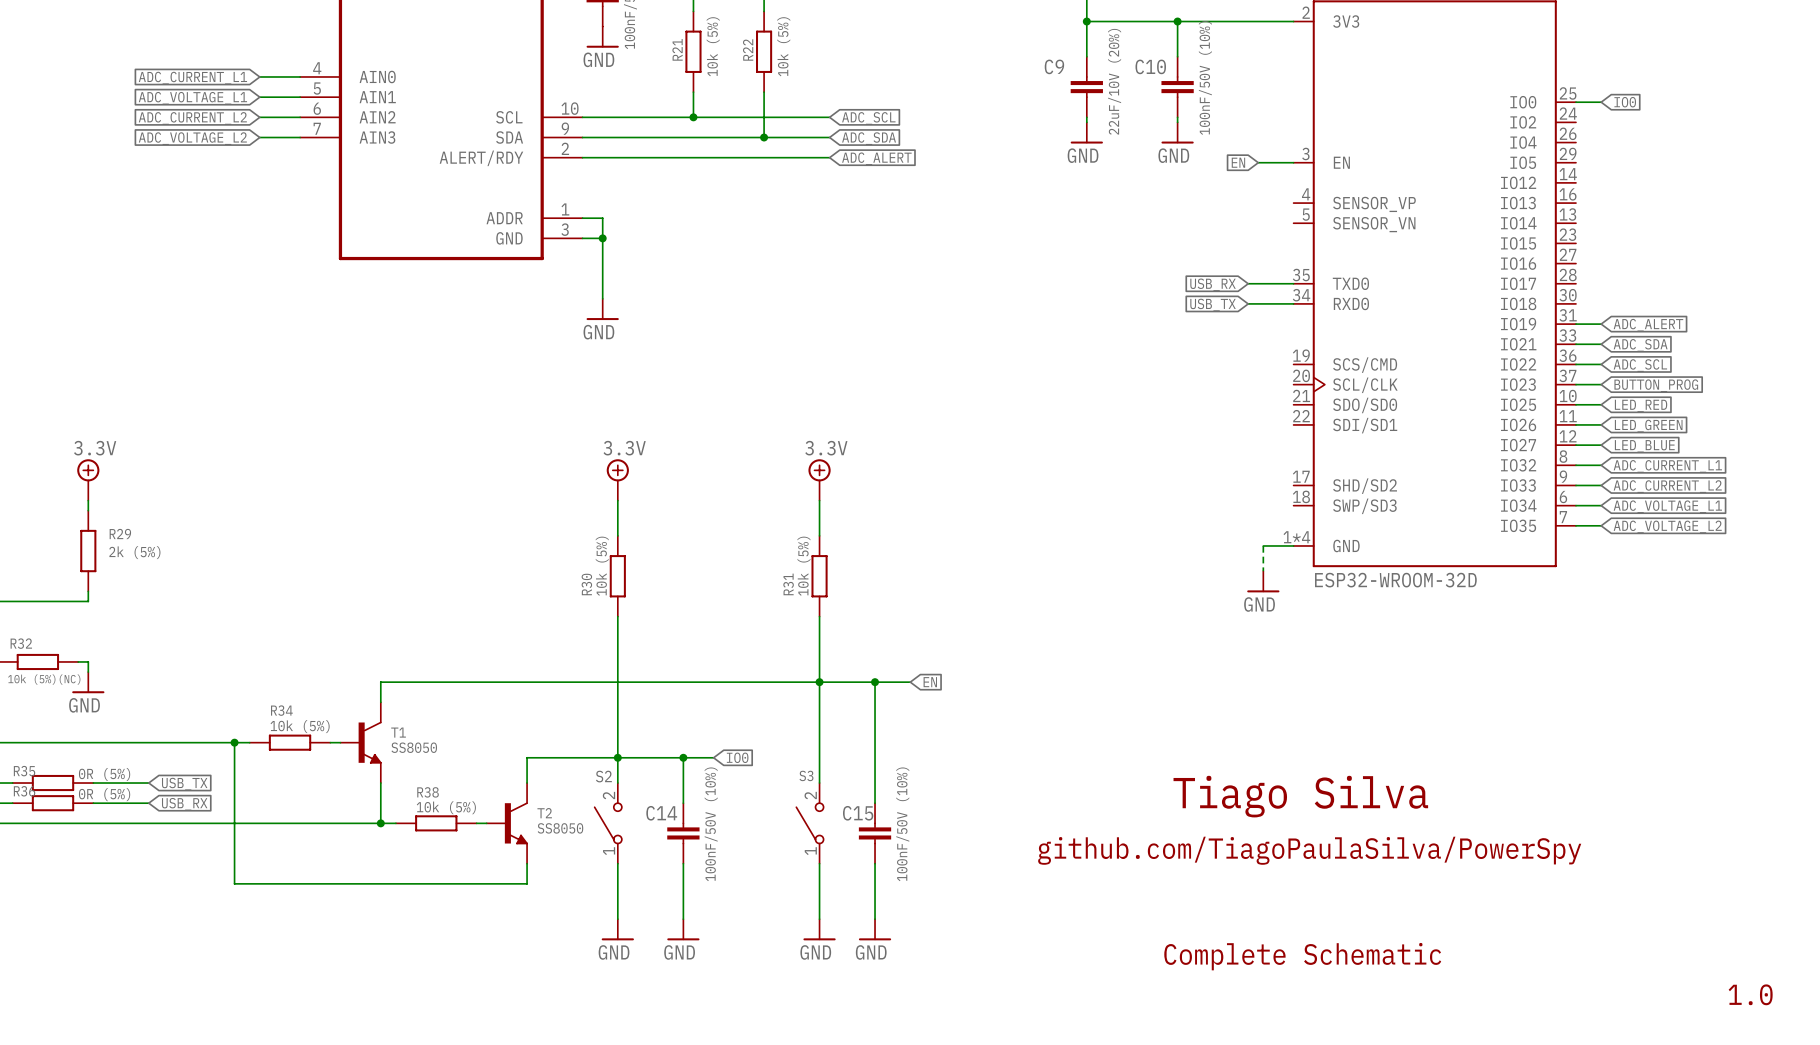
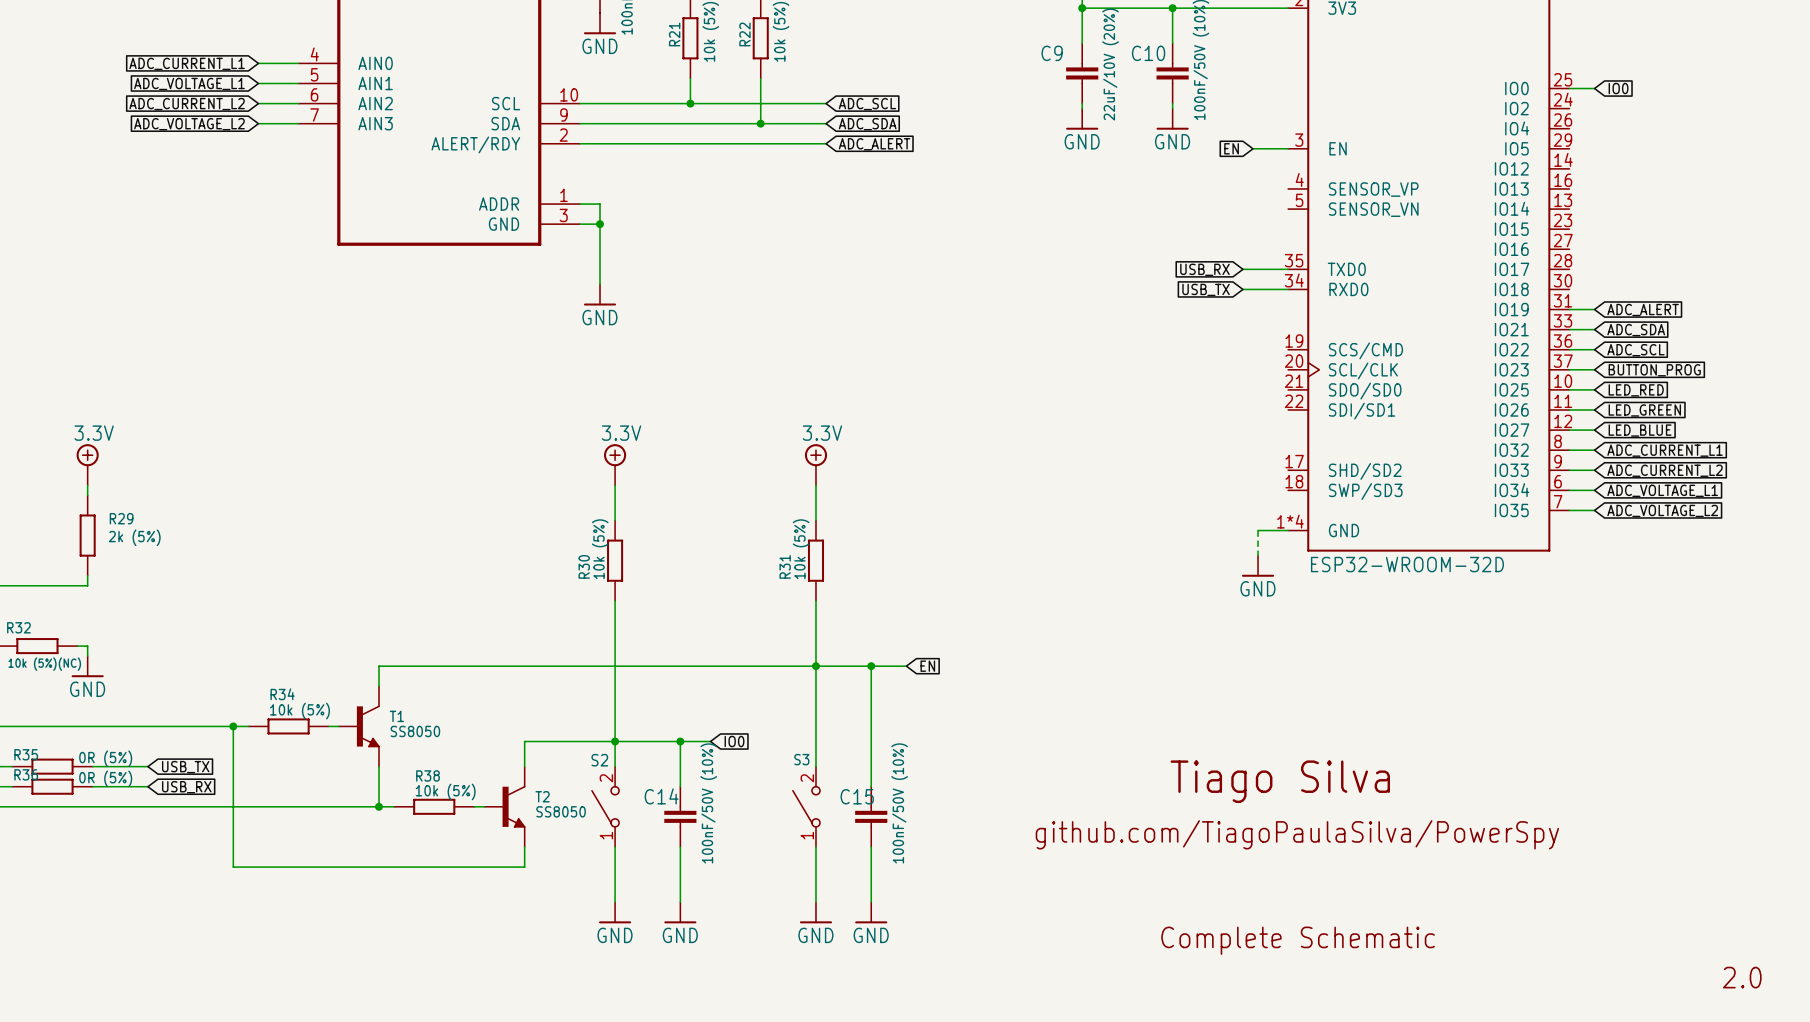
text: 1.0 (1750, 994) -> 2.0 (1742, 977)

